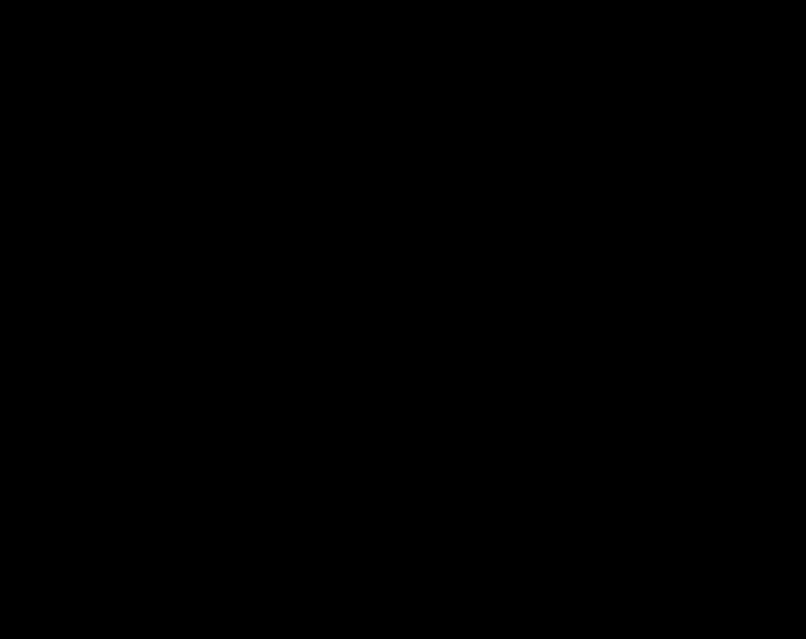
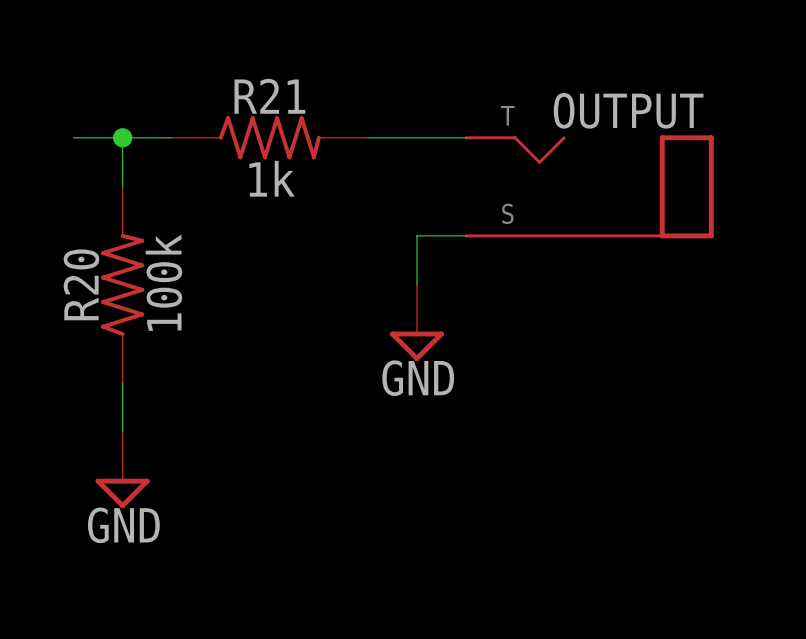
wire: none -> (73, 137) (171, 137)
wire: none -> (122, 137) (122, 186)
junction: none -> (122, 137)
R21: none -> 1k (269, 137)
wire: none -> (367, 137) (466, 137)
OUTPUT: none -> (589, 186)
wire: none -> (466, 235) (416, 235) (416, 284)
R20: none -> 100k (122, 284)
power symbol: none -> GND (416, 322)
wire: none -> (122, 383) (122, 432)
power symbol: none -> GND (122, 470)

